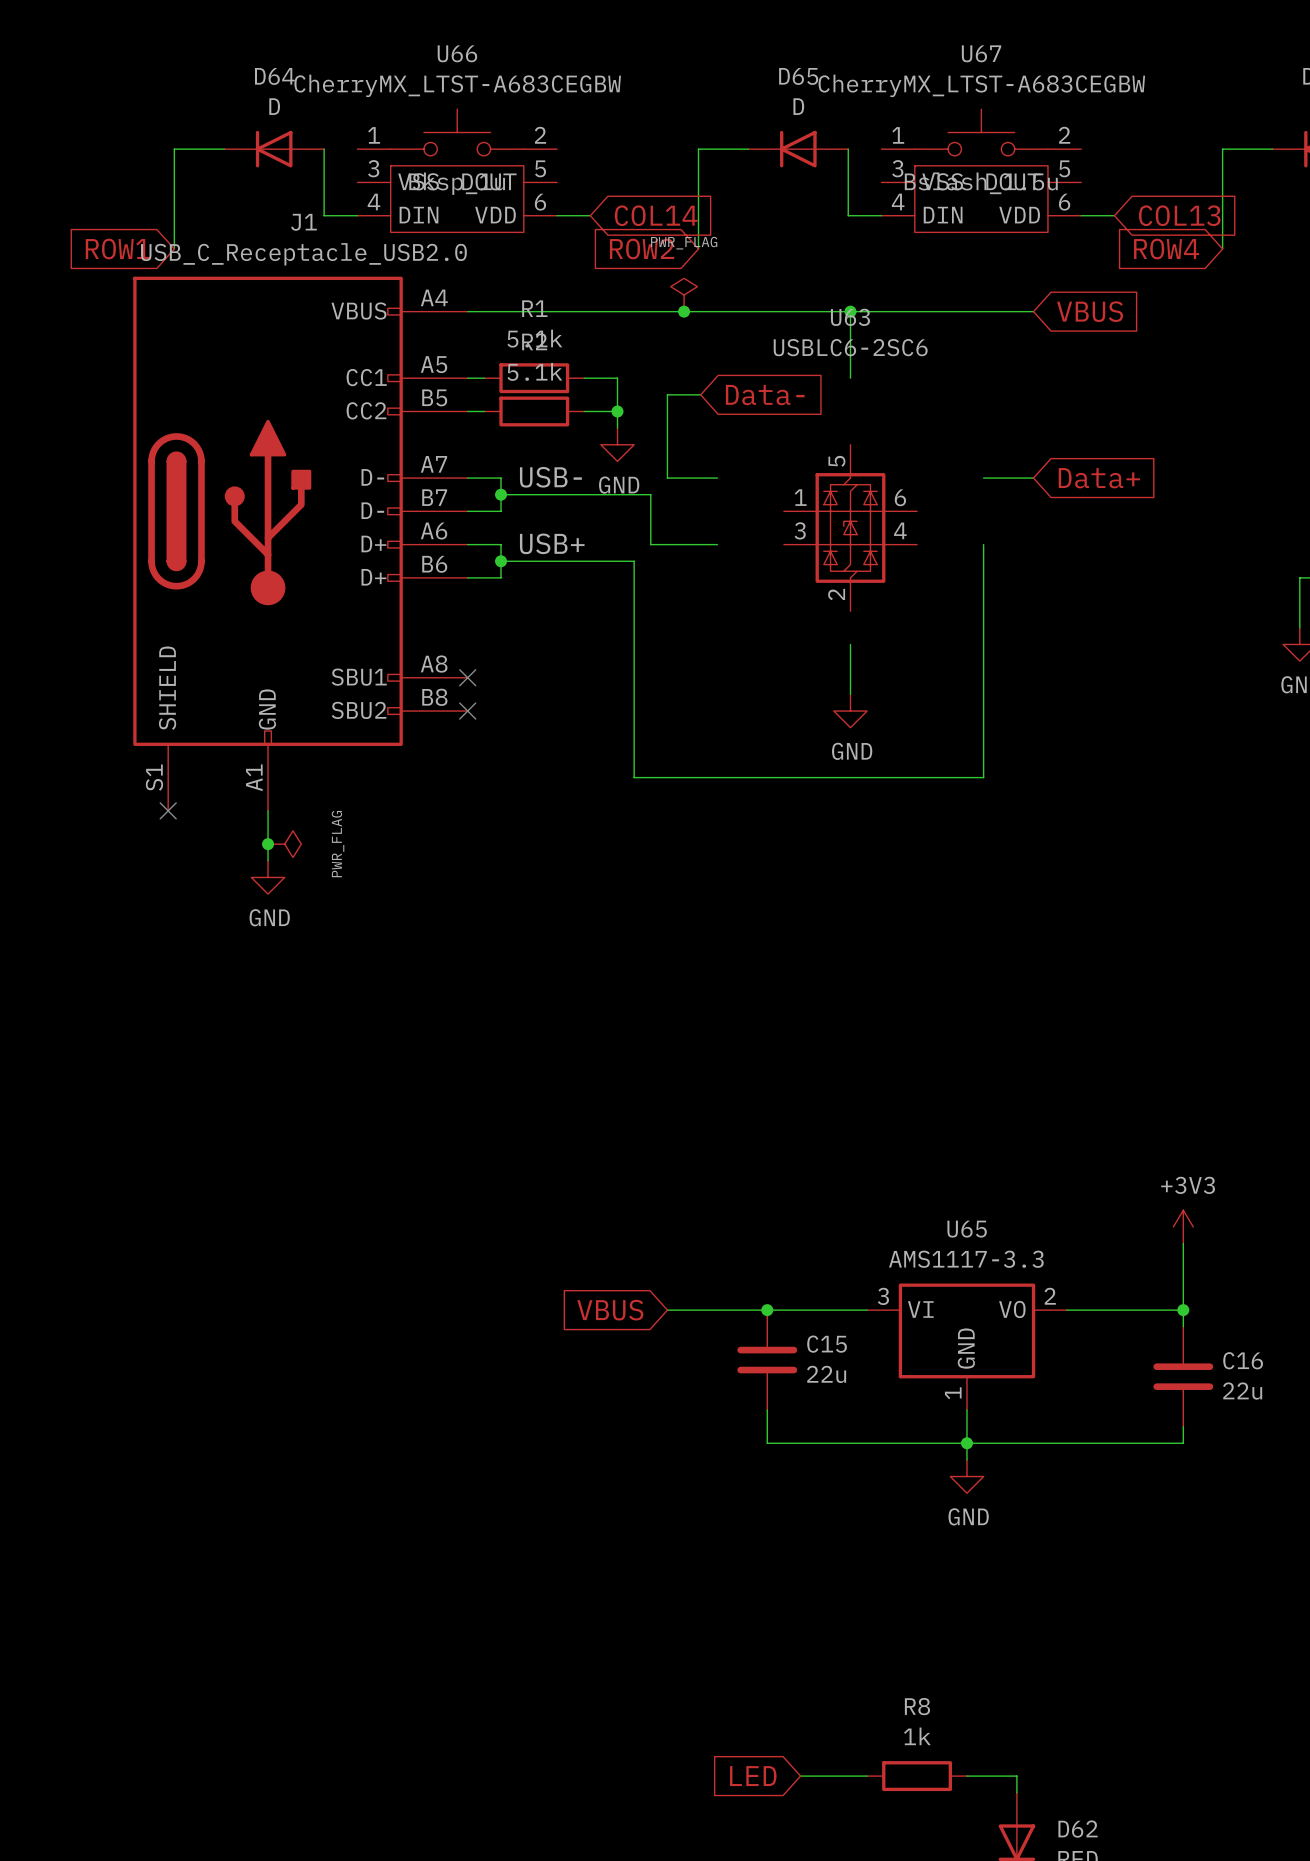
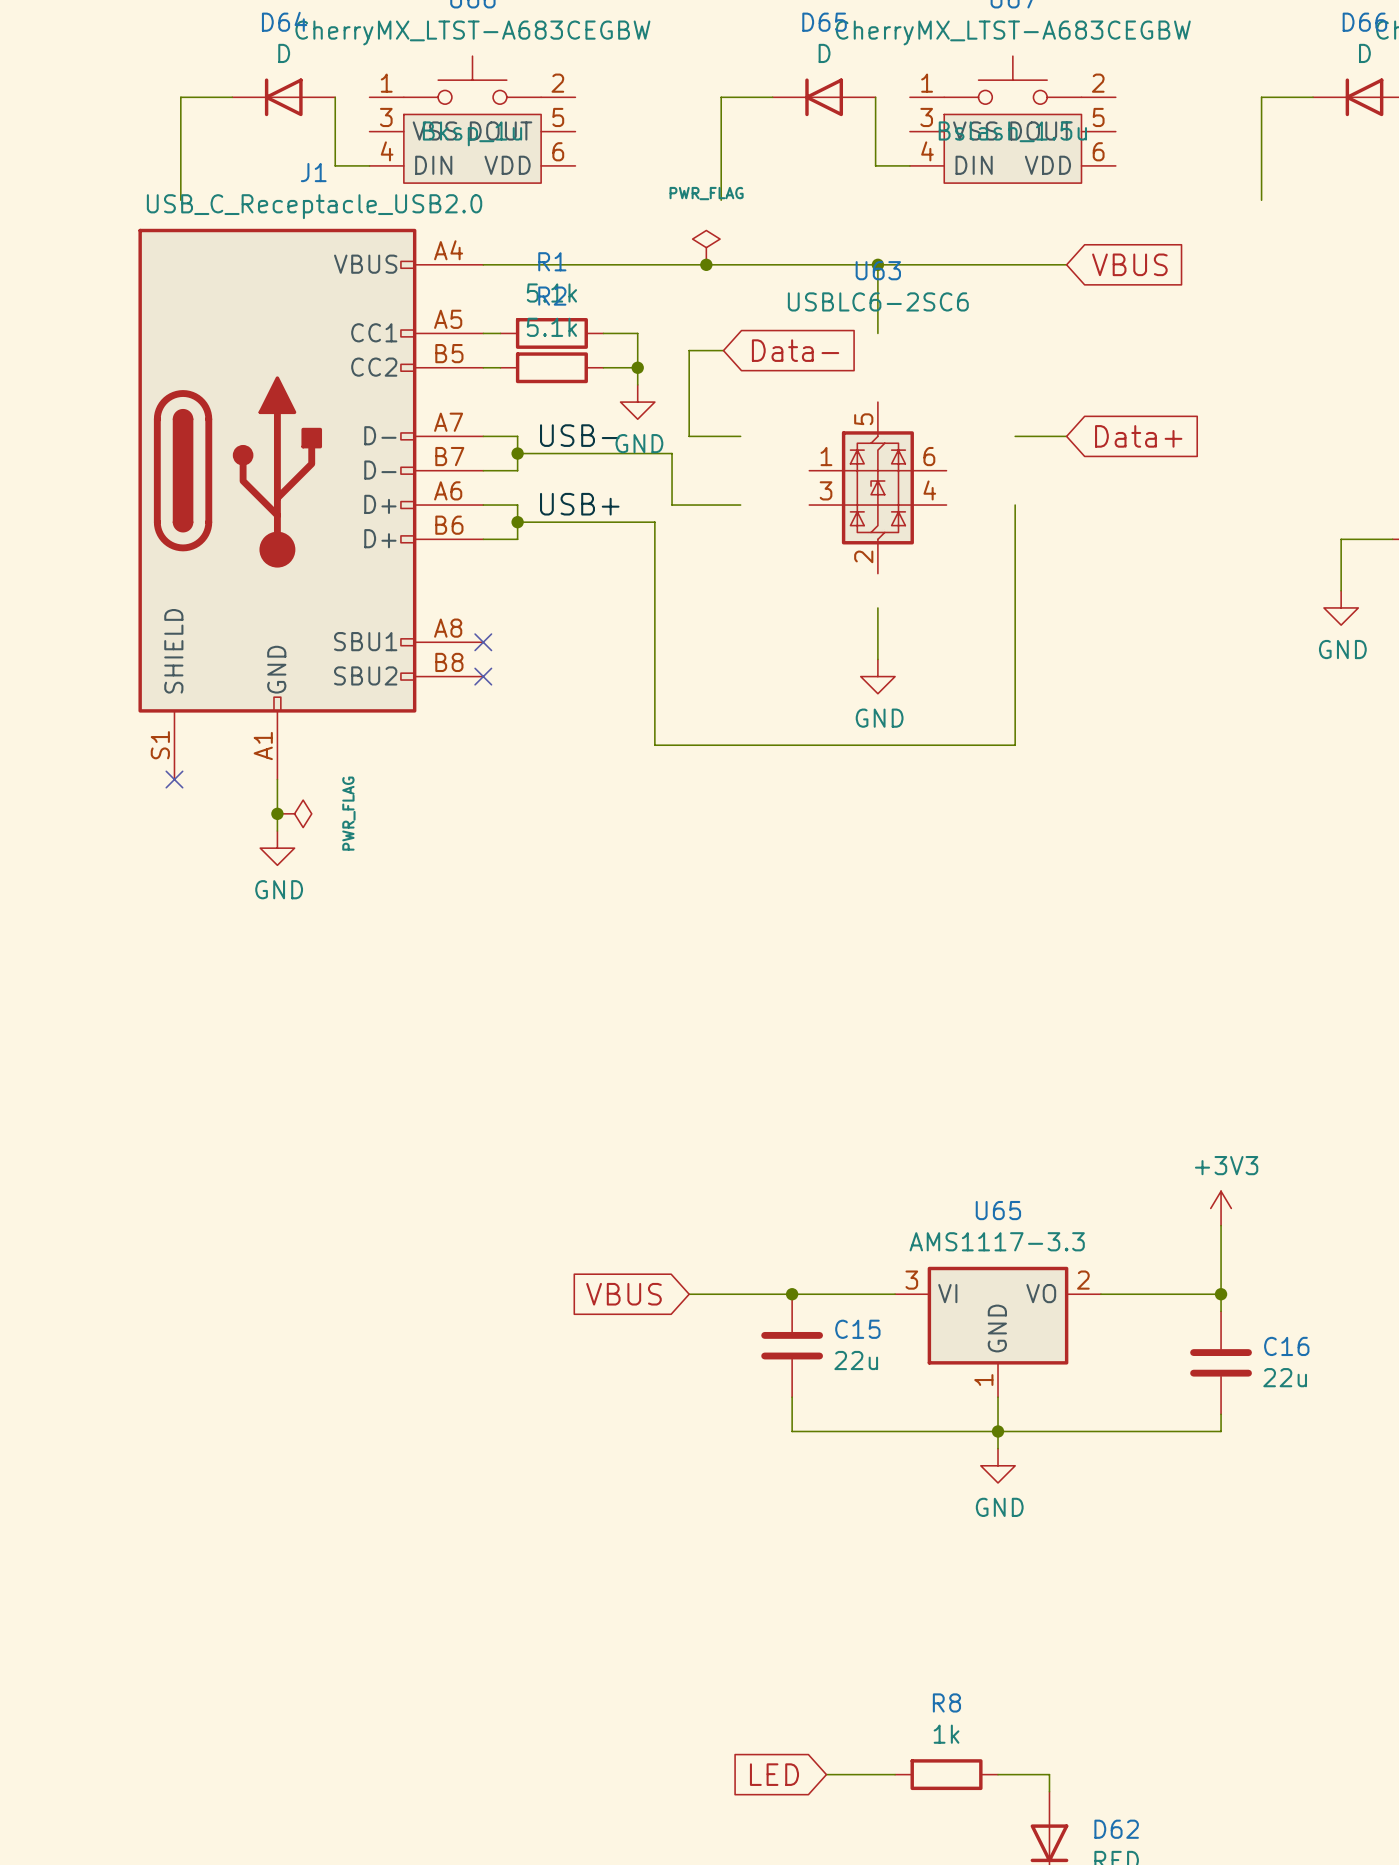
wire: (557, 215) (590, 215) -> none
global label: COL14 (656, 215) -> none
wire: (1081, 215) (1114, 215) -> none
global label: COL13 (1179, 215) -> none
global label: ROW1 (118, 249) -> none
global label: ROW2 (642, 249) -> none
global label: ROW4 (1166, 249) -> none

